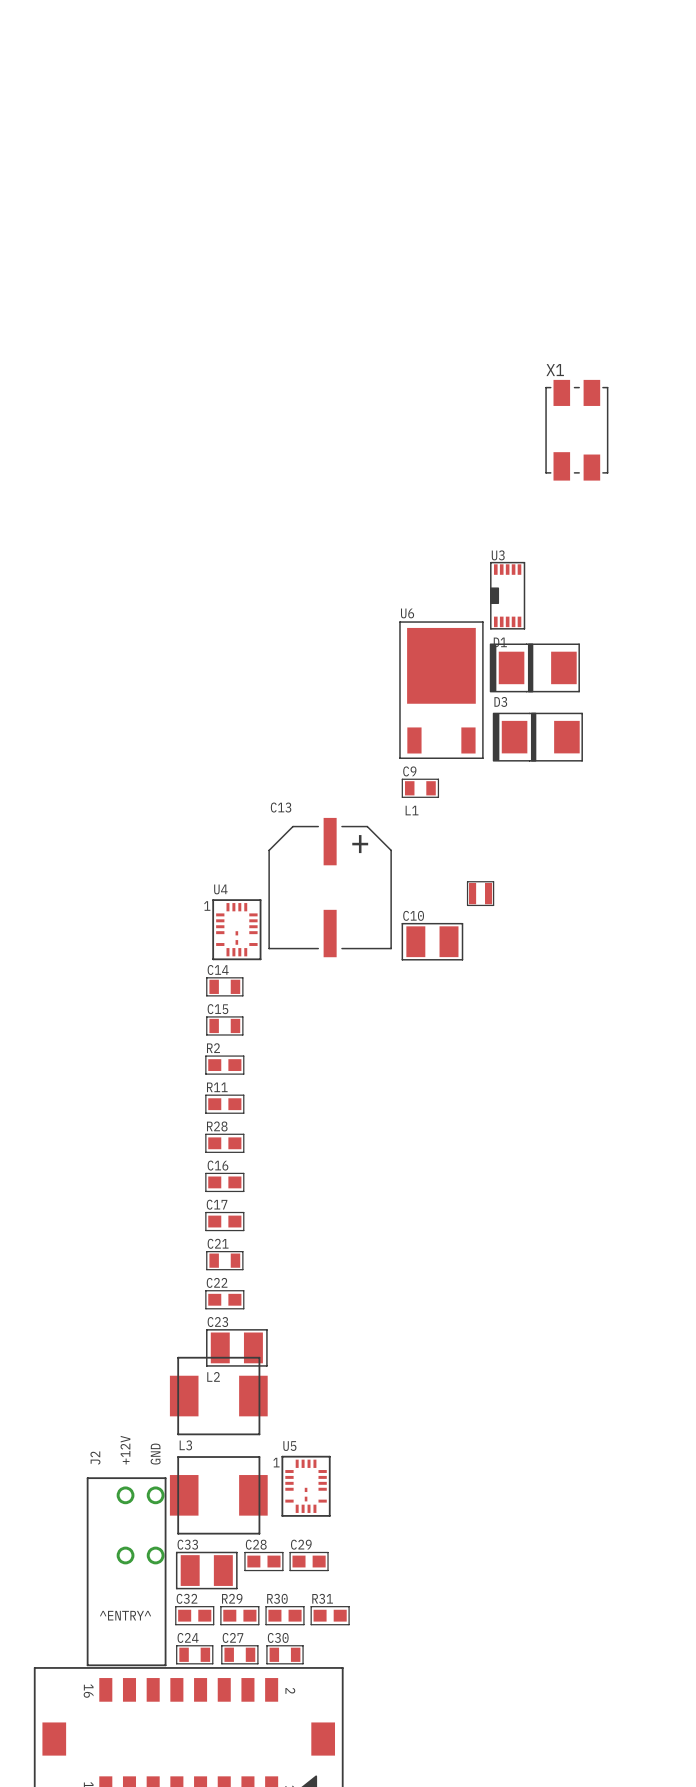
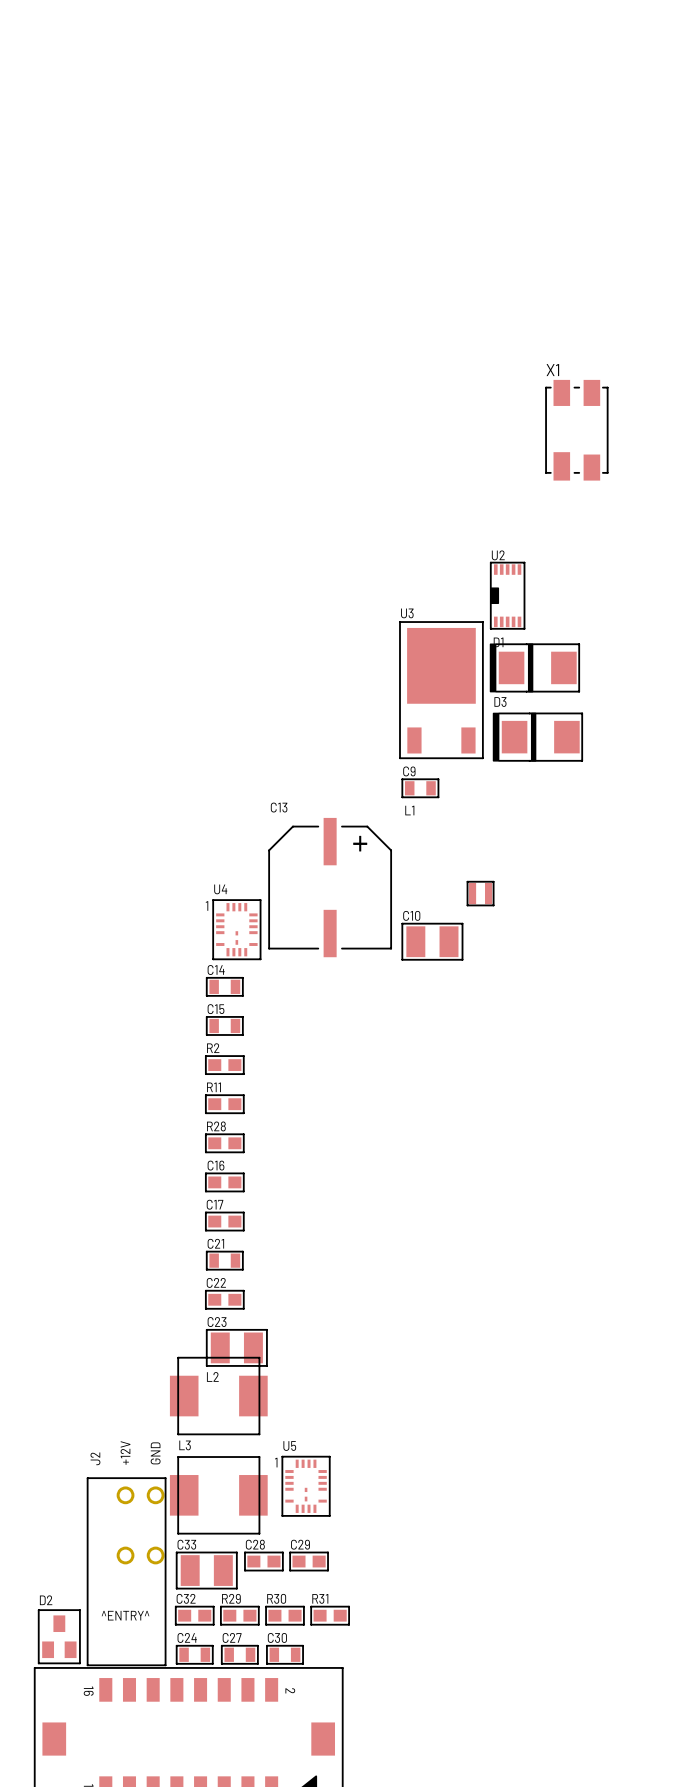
U3 name: U3 (498, 555) -> U2 (498, 555)
U6 name: U6 (407, 613) -> U3 (407, 613)
D2: none -> (59, 1636)

